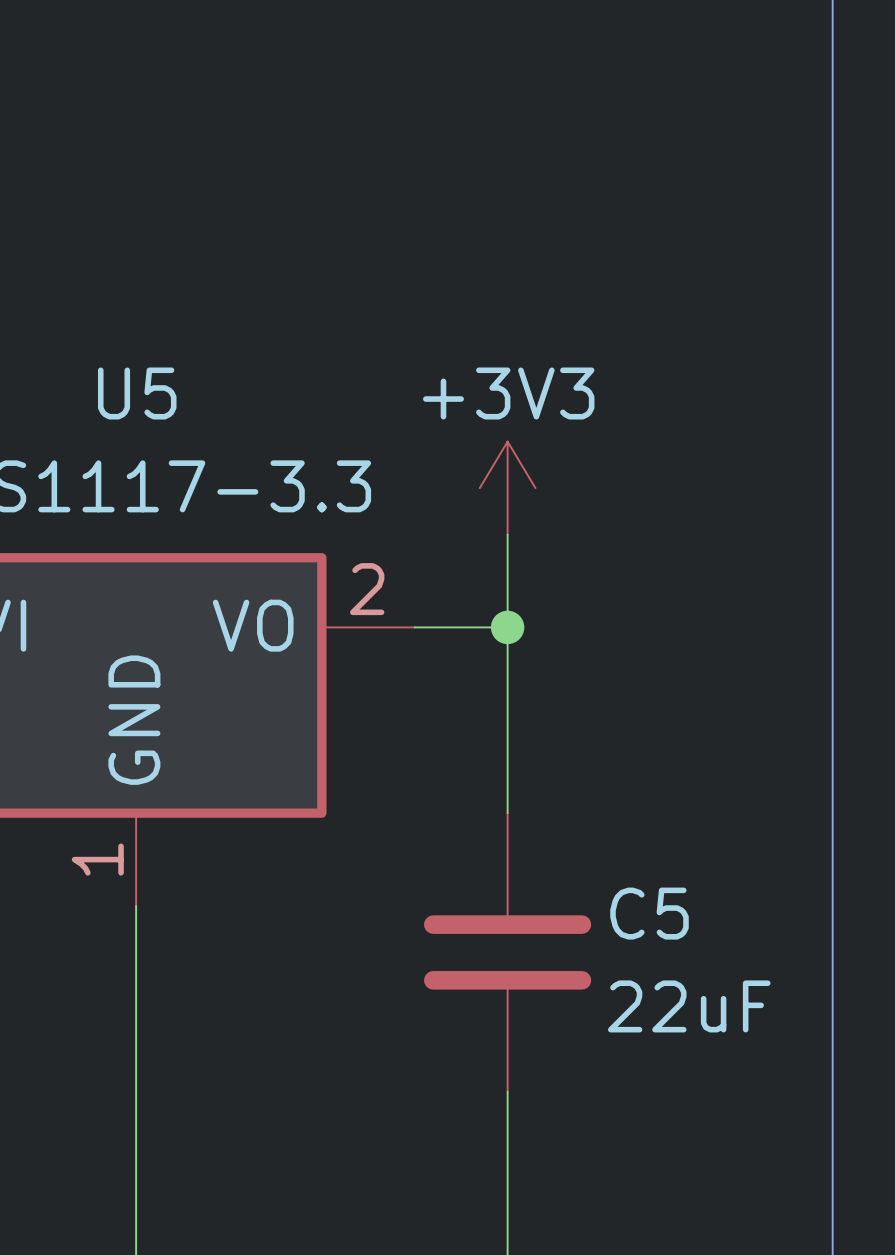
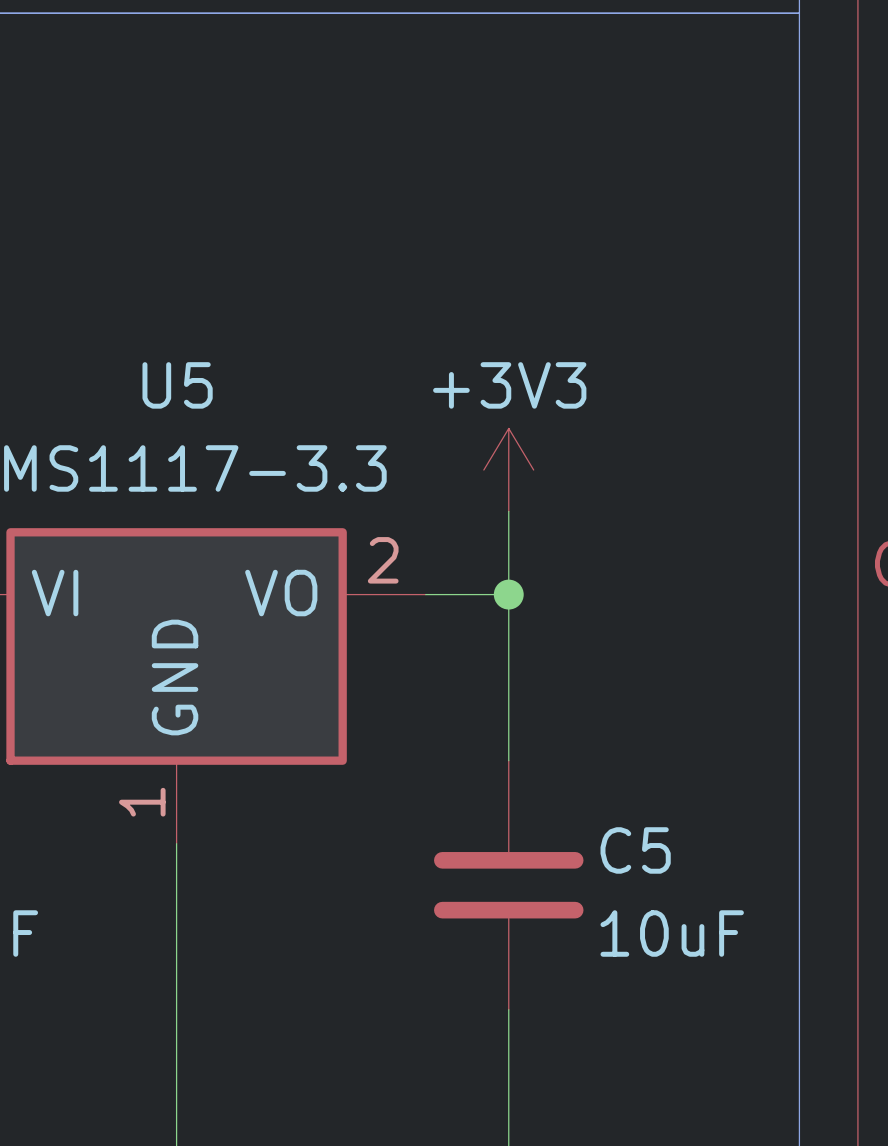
C5 value: 22uF (689, 1006) -> 10uF (672, 933)

